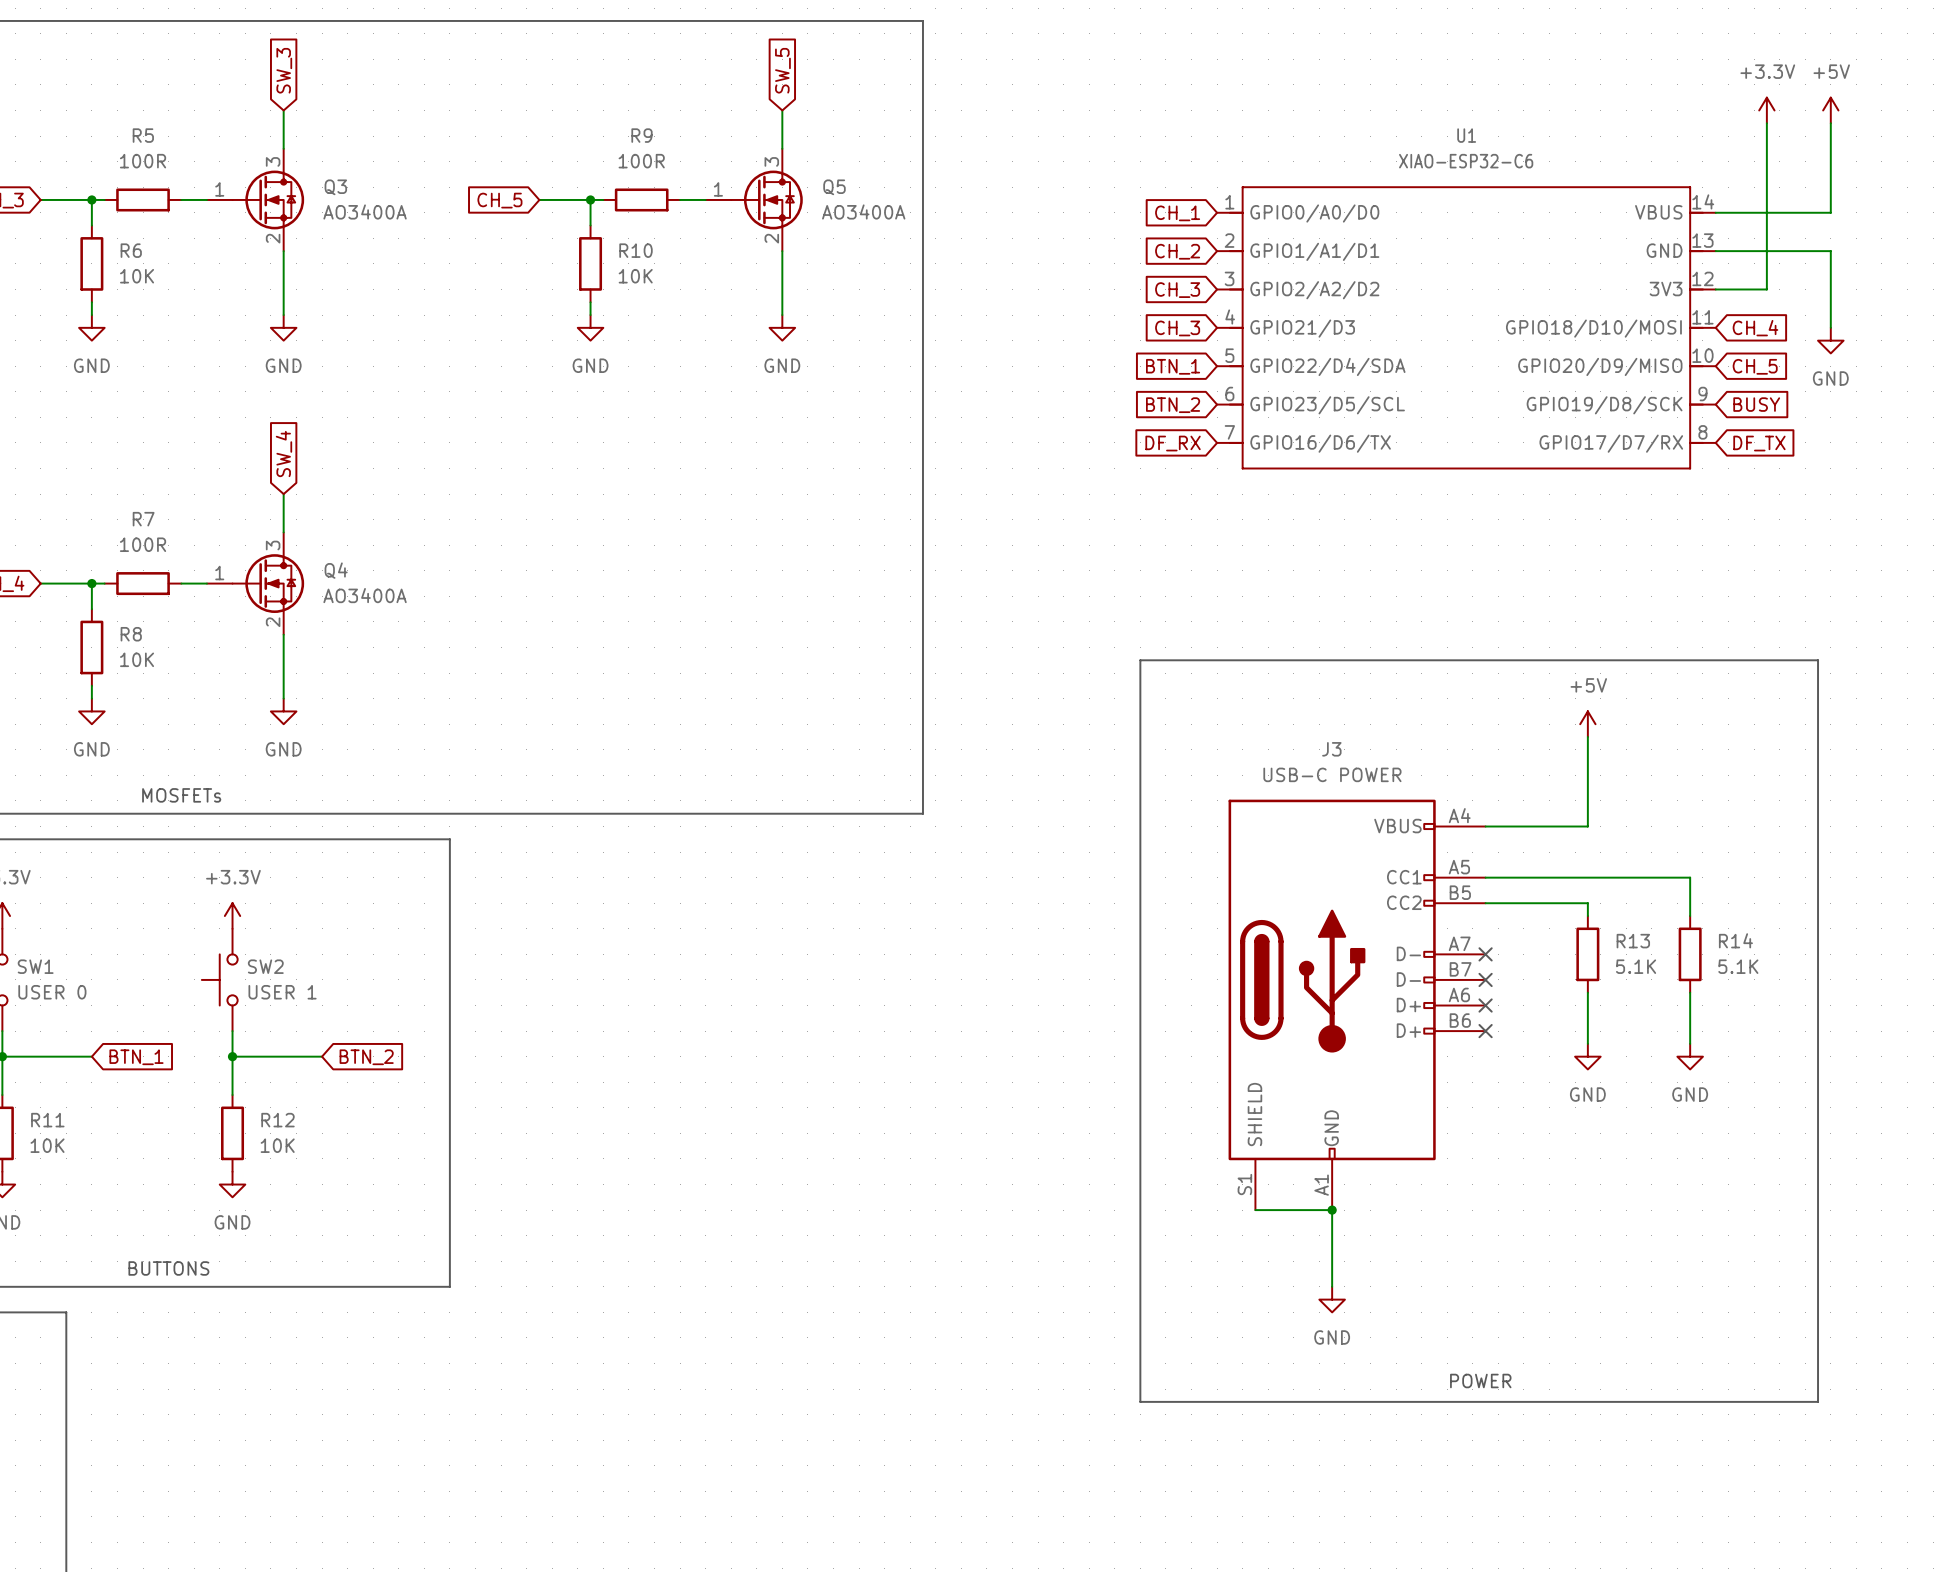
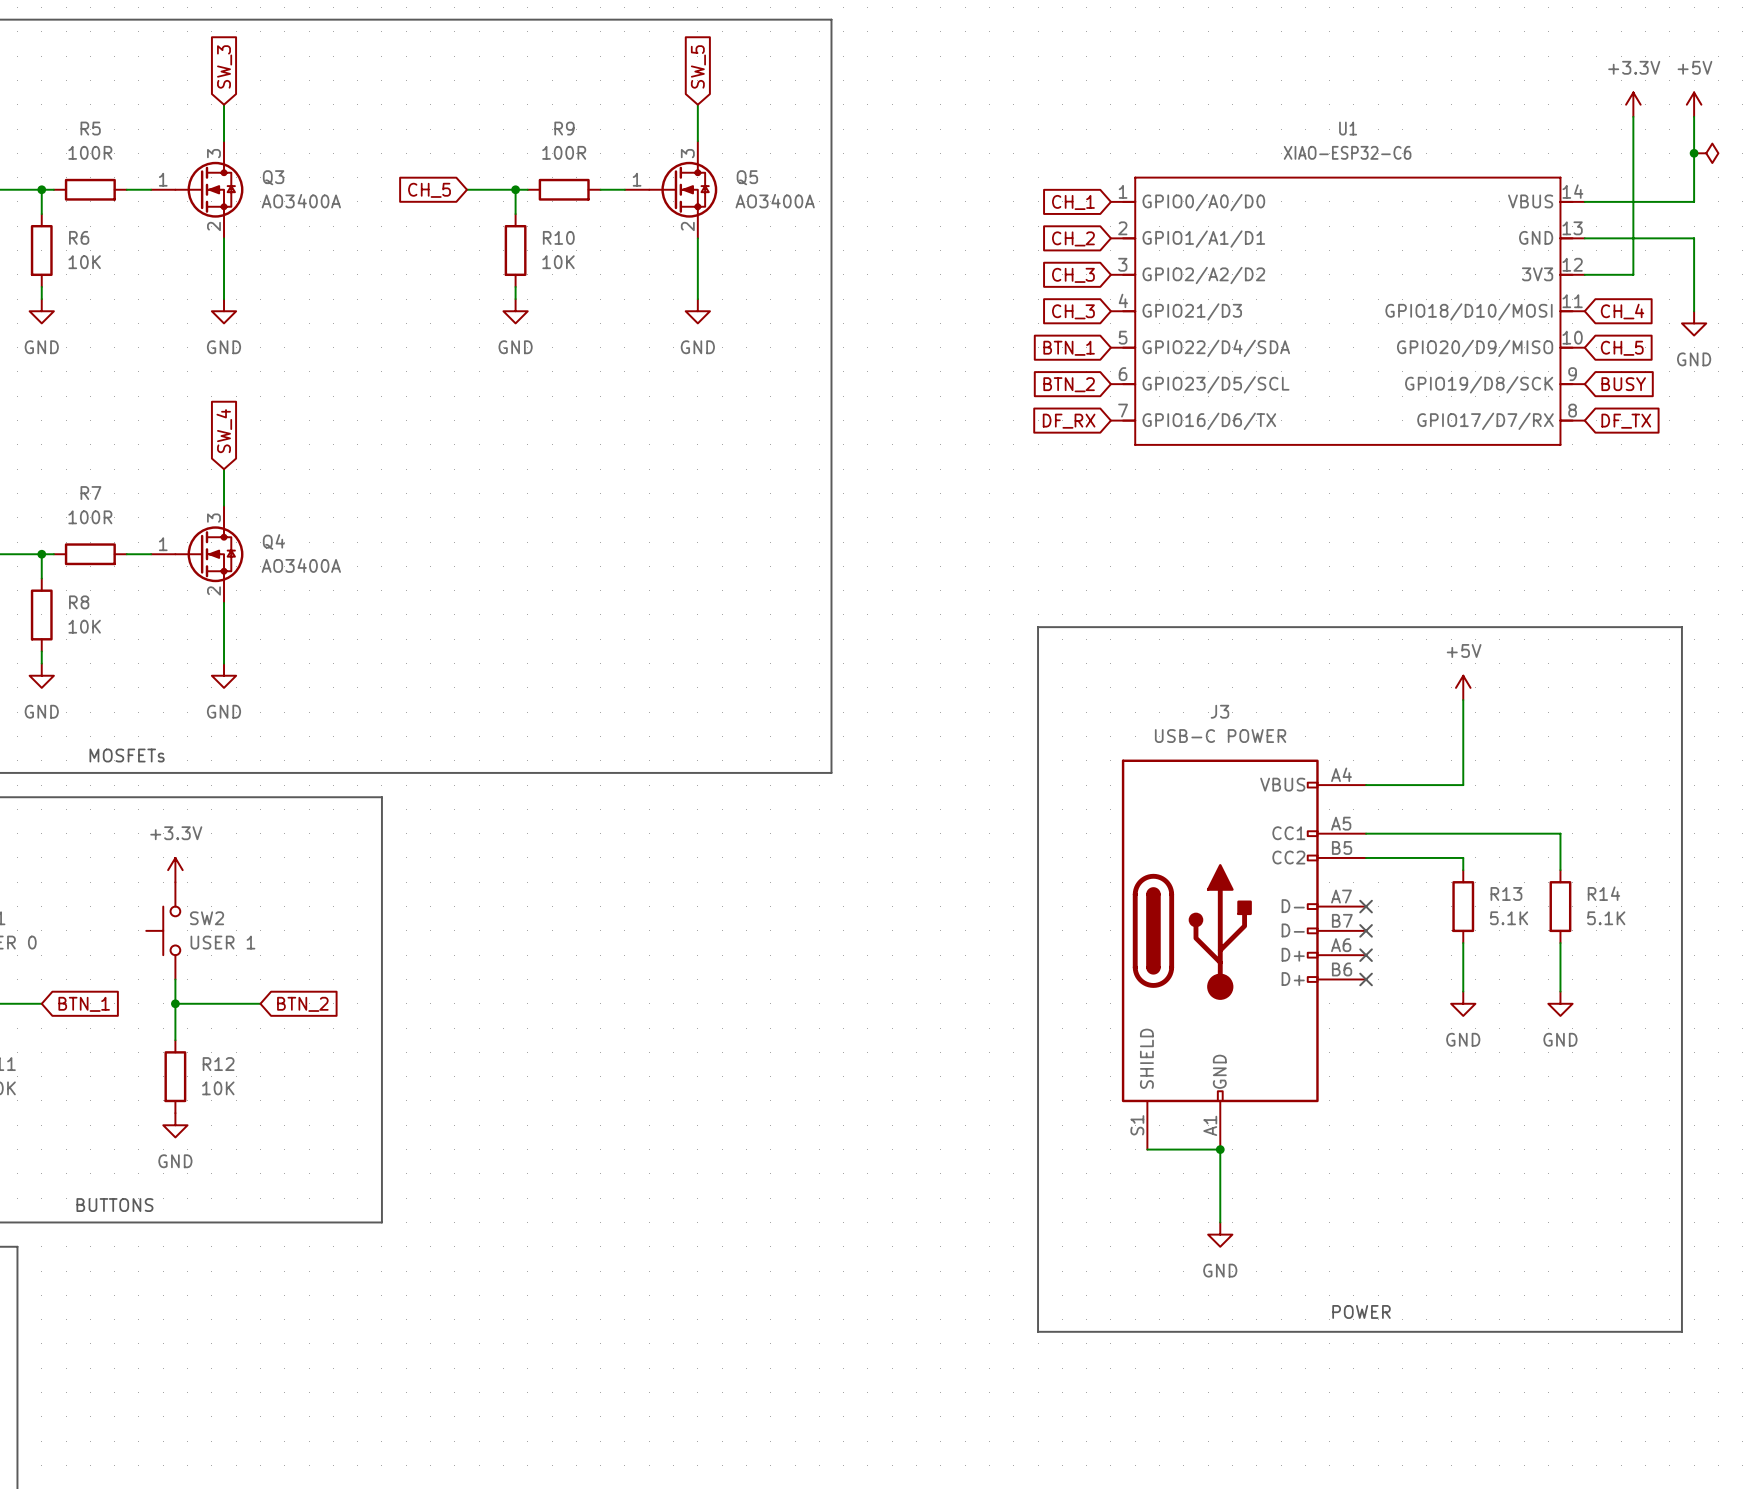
junction: none -> (1694, 153)
power symbol: none -> (1706, 153)

